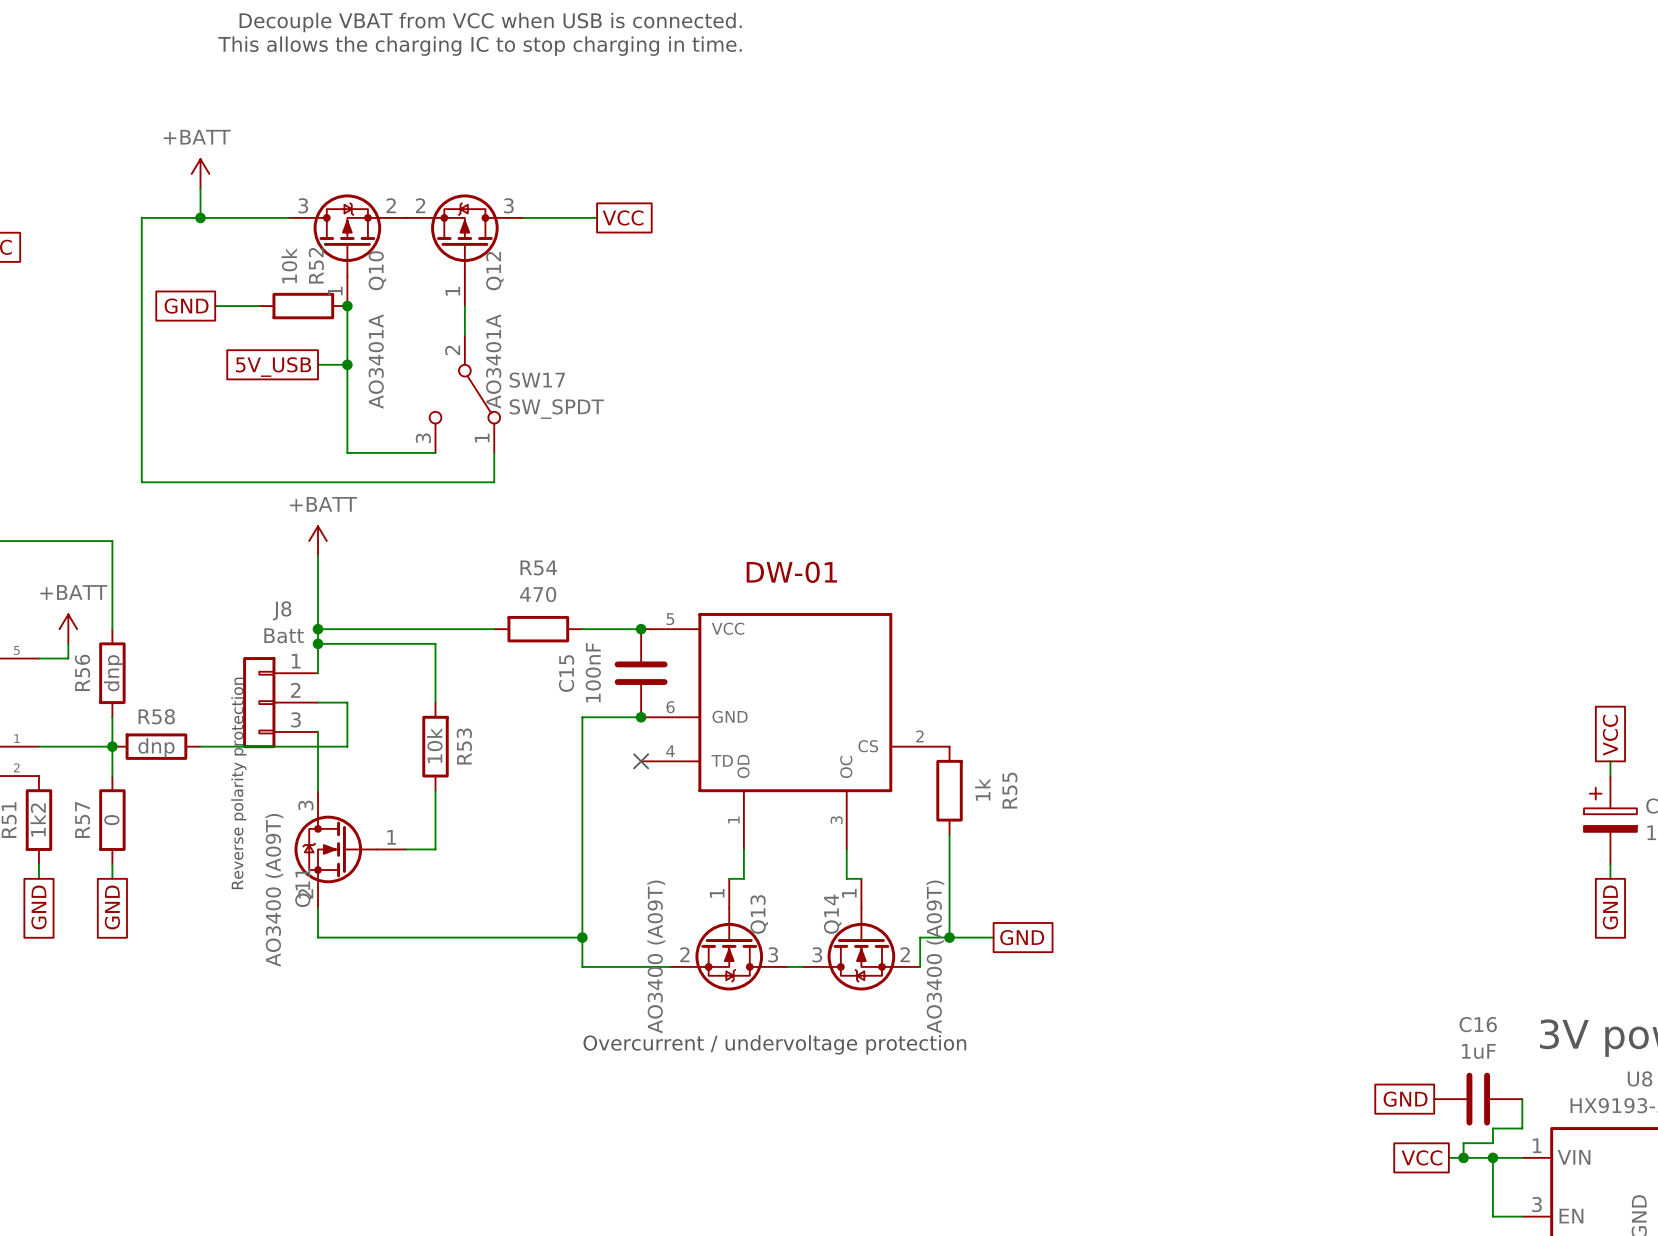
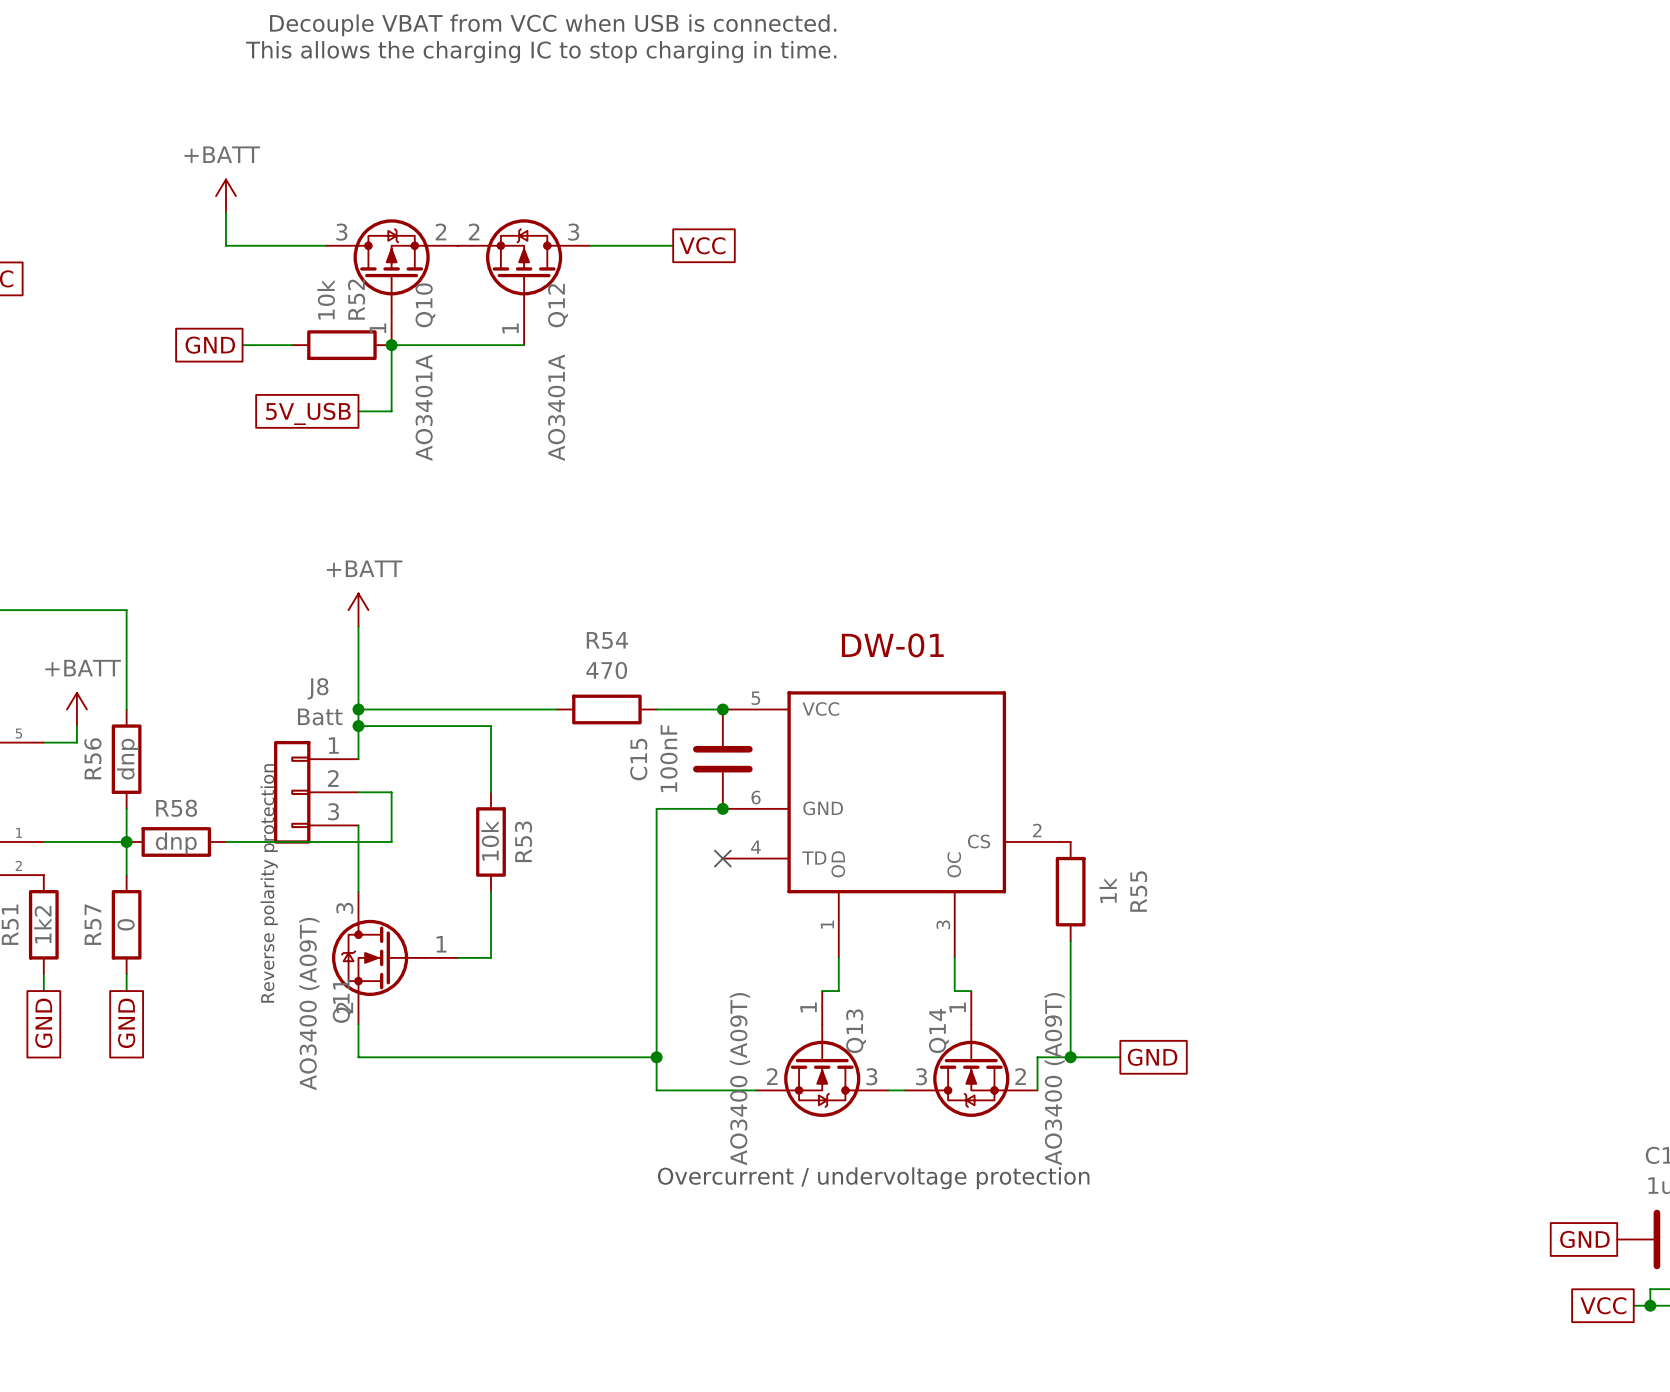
wire: (200, 217) (141, 217) (141, 482) (494, 482) (494, 452) -> none
junction: (200, 217) -> none
wire: (464, 306) (464, 335) -> (524, 345) (391, 345)
wire: (347, 364) (347, 452) (435, 452) -> none
junction: (347, 364) -> none
SW17: SW_SPDT (464, 394) -> none

